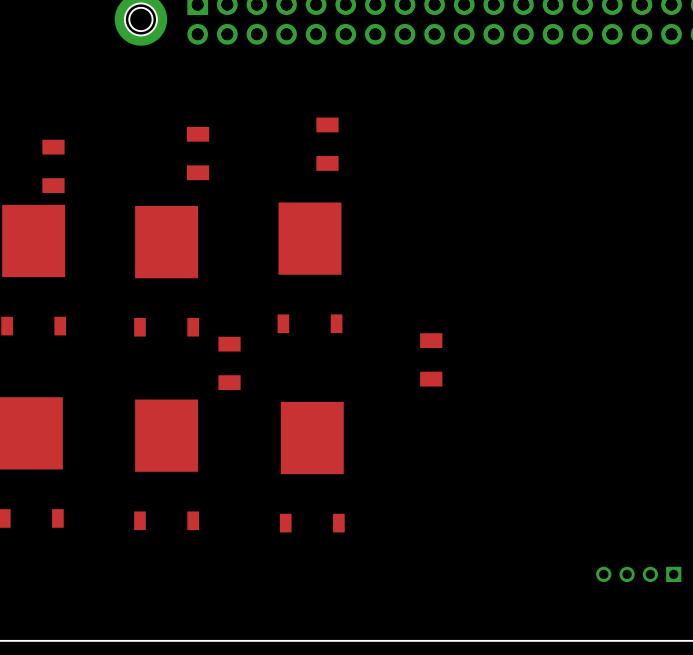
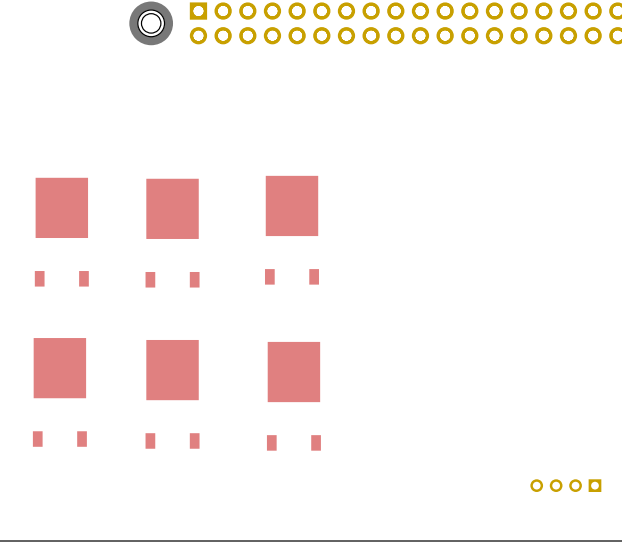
part: (327, 144) -> none
part: (198, 153) -> none
part: (53, 166) -> none
part: (431, 359) -> none
part: (229, 363) -> none

